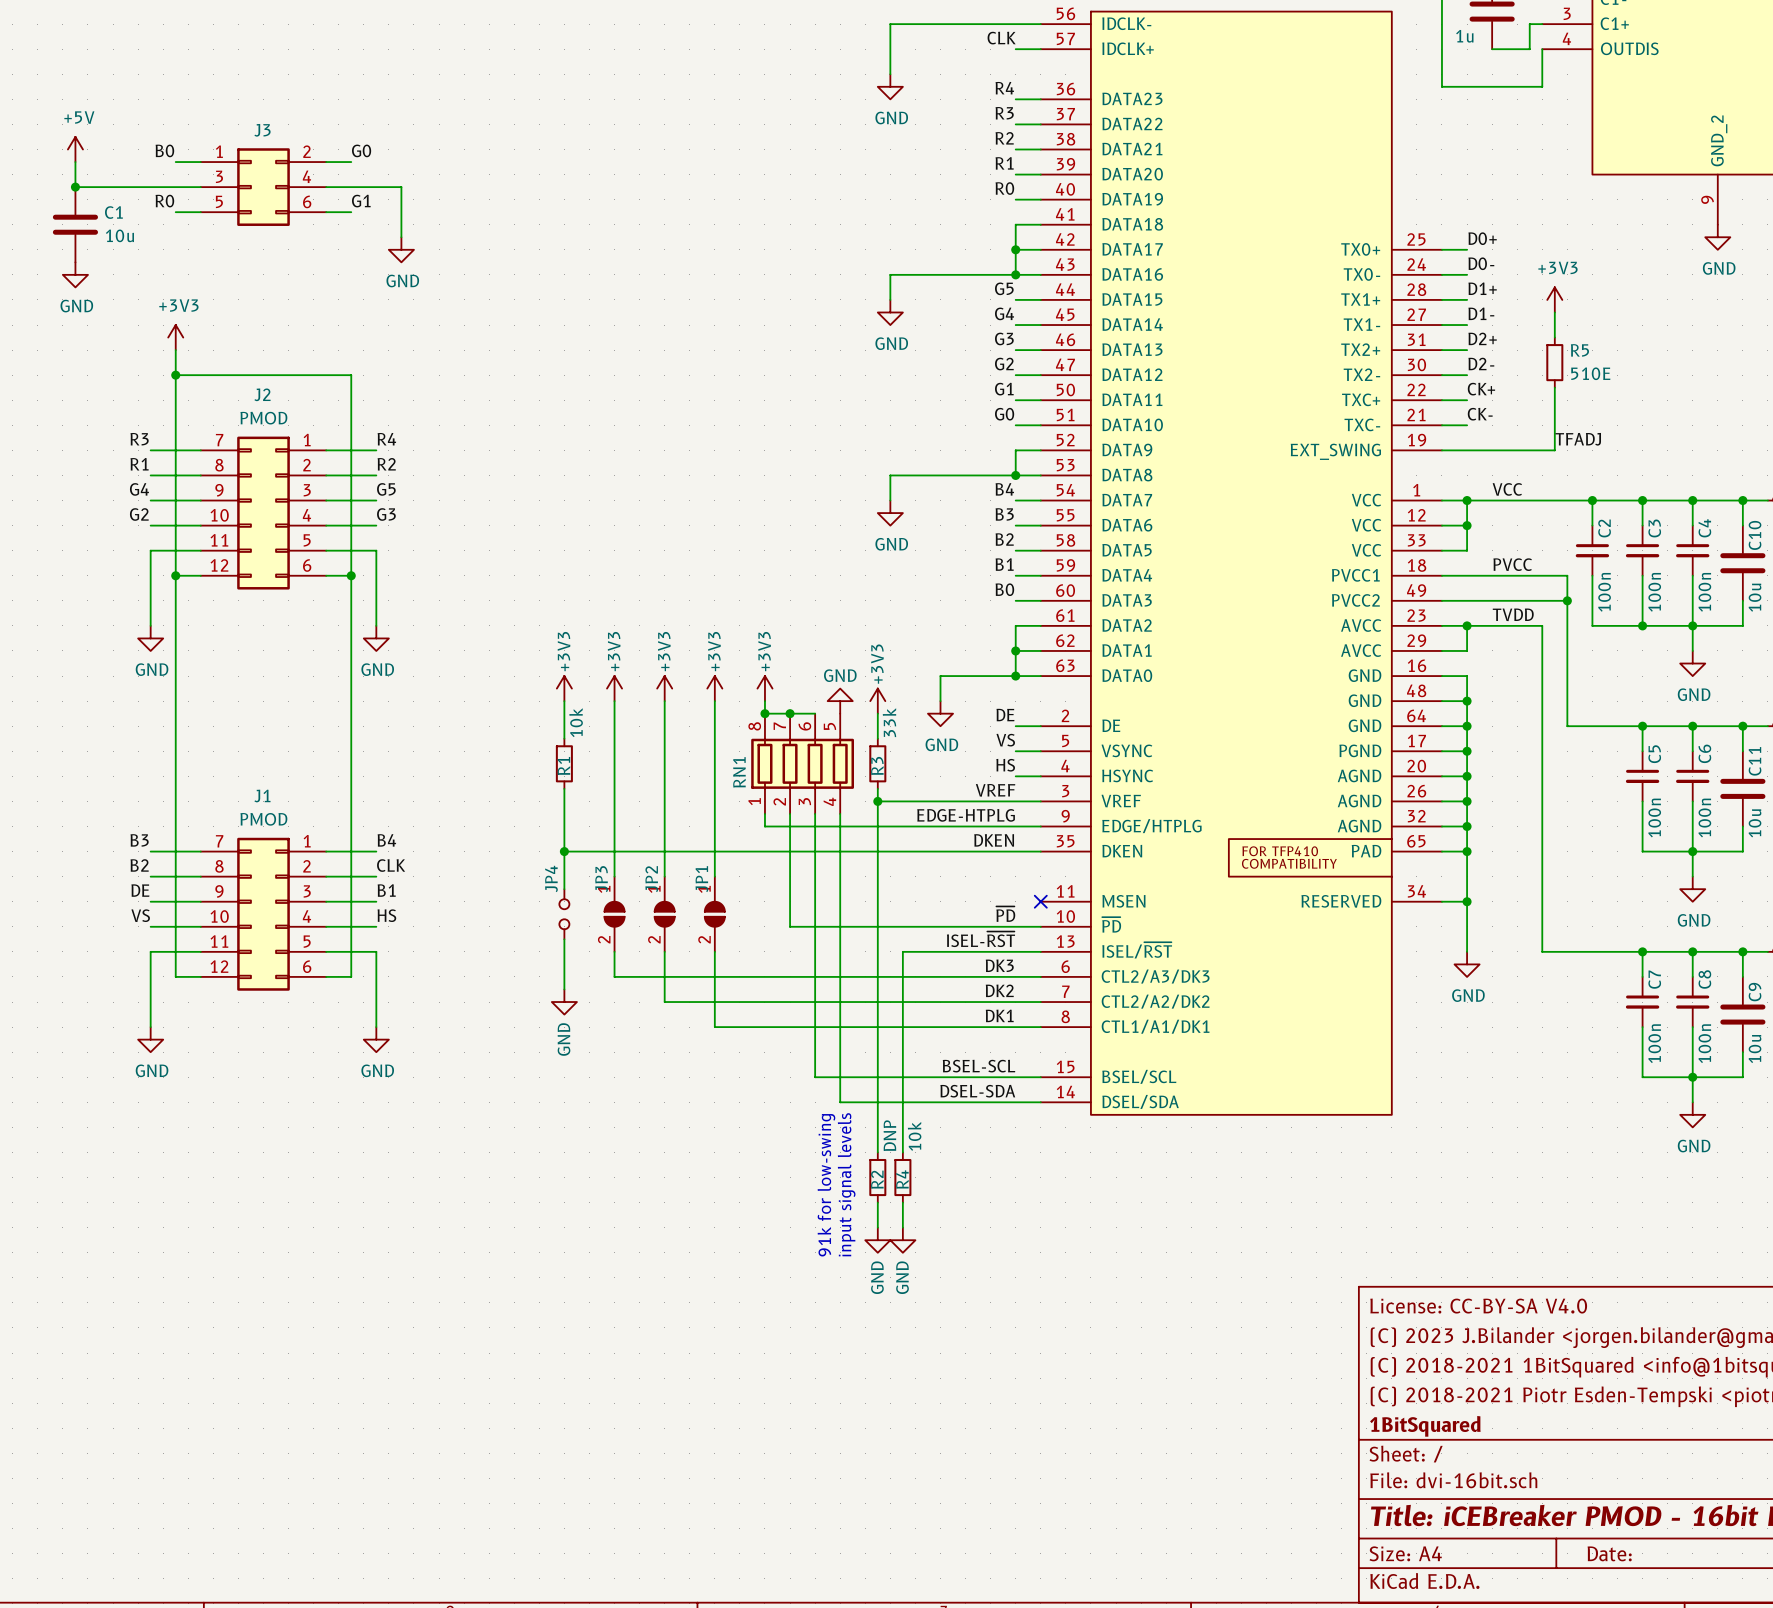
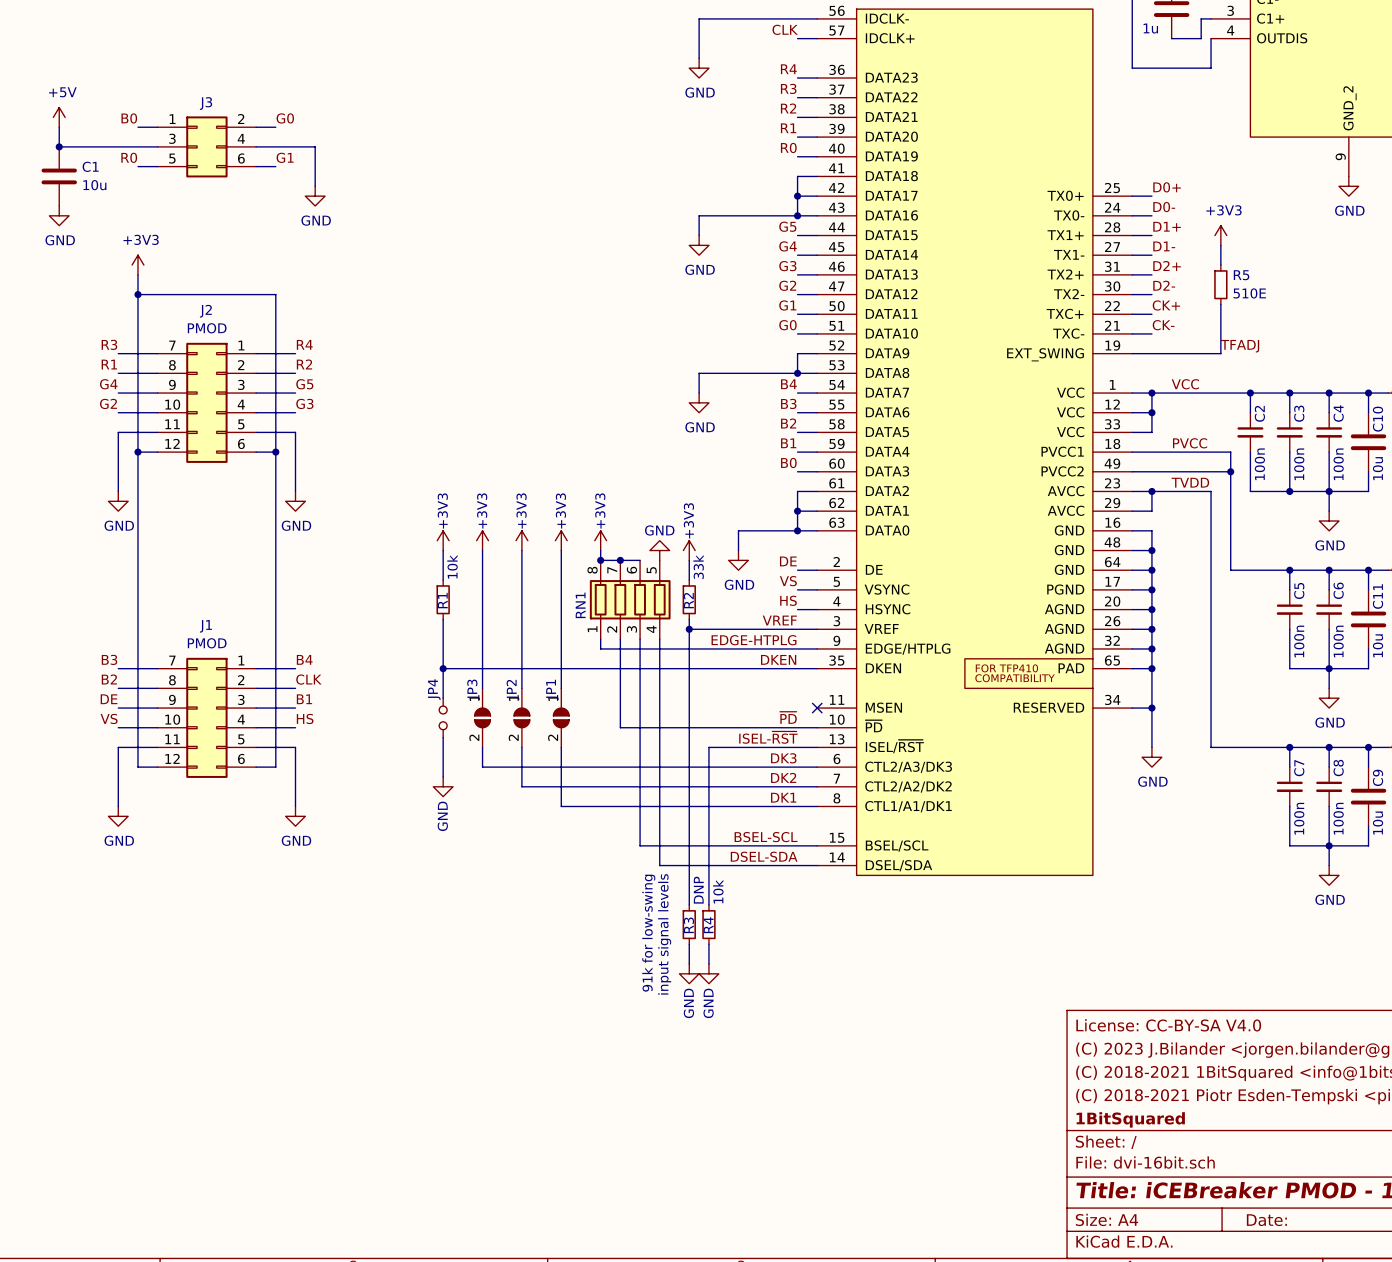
R3 name: R3 (877, 765) -> R2 (688, 600)
R2 name: R2 (877, 1179) -> R3 (688, 925)

